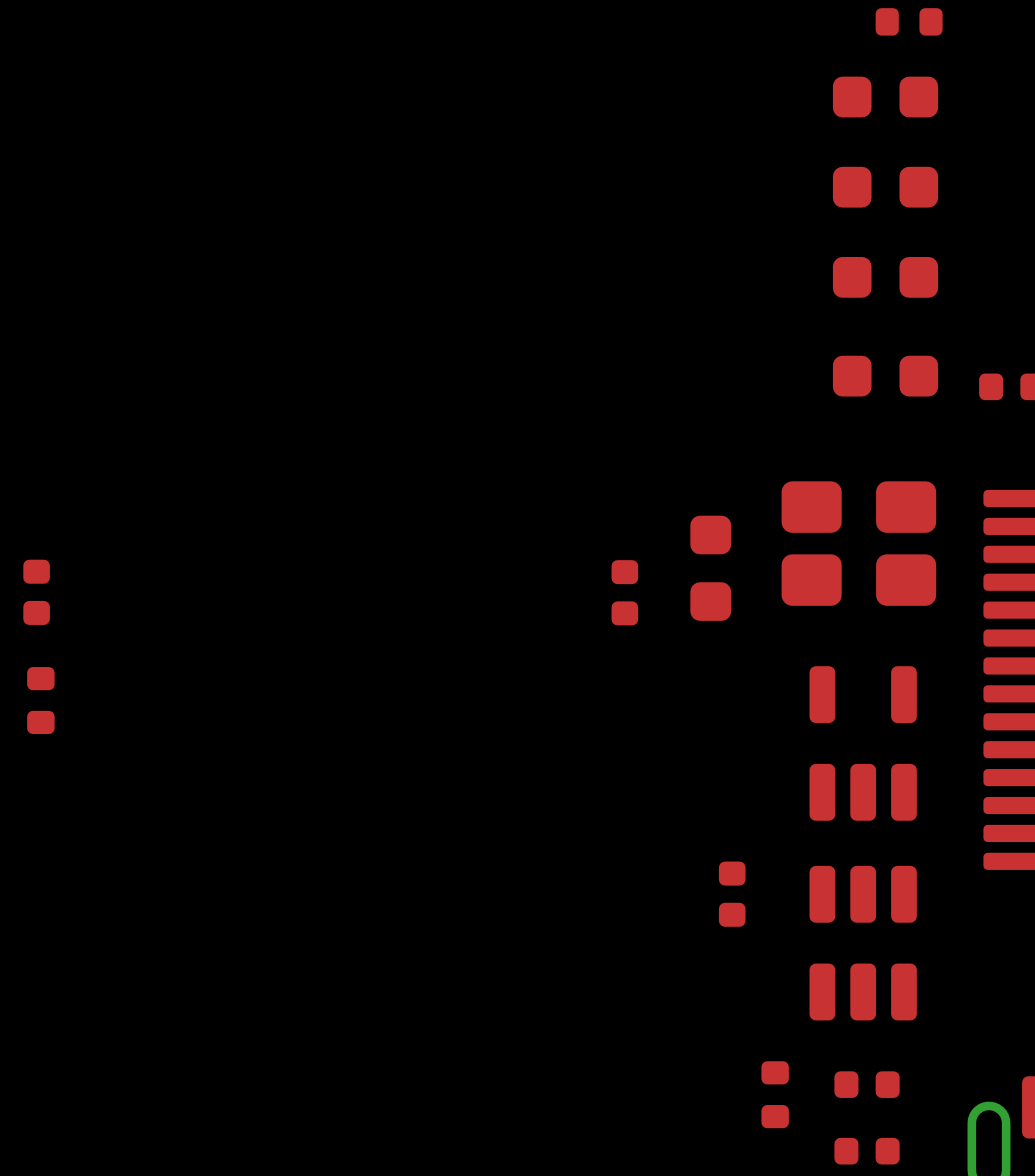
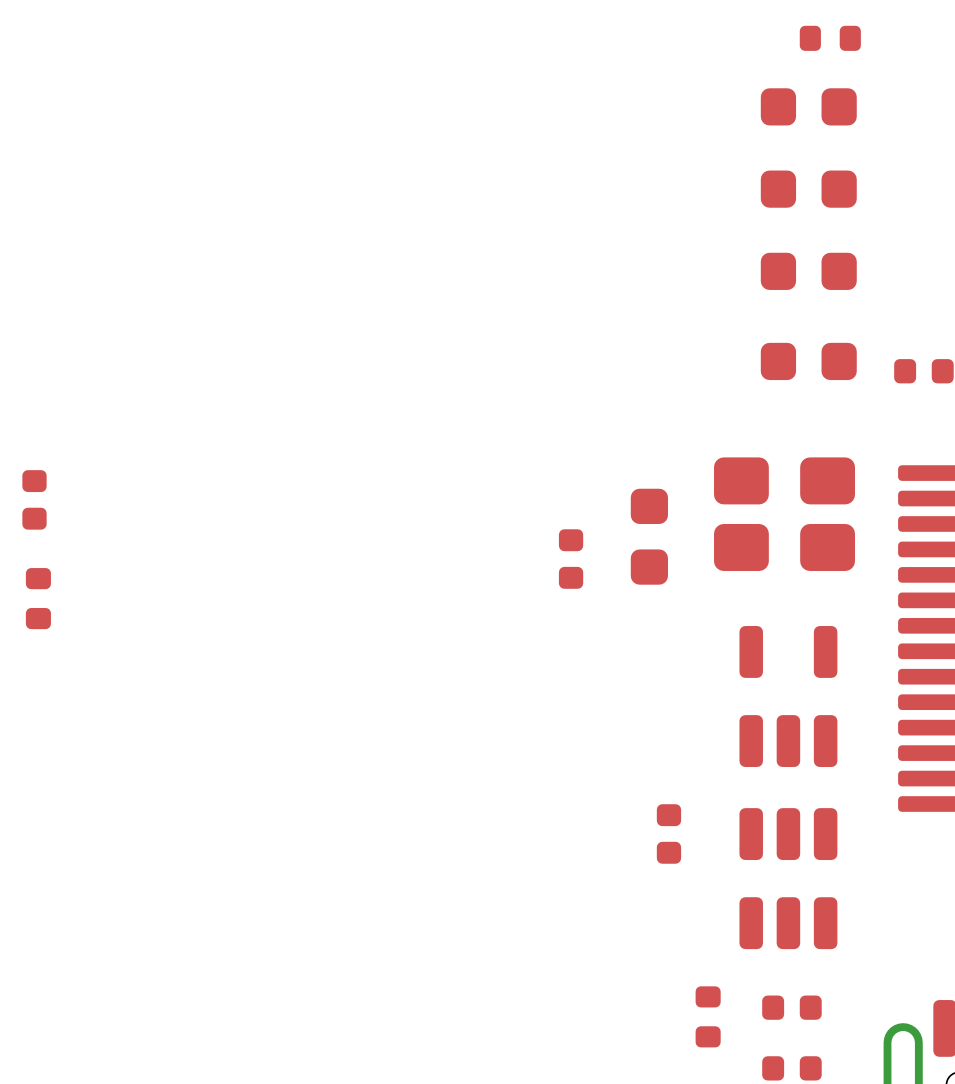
part: none -> (34, 499)
part: (36, 592) -> none
part position: (40, 700) -> (38, 598)

